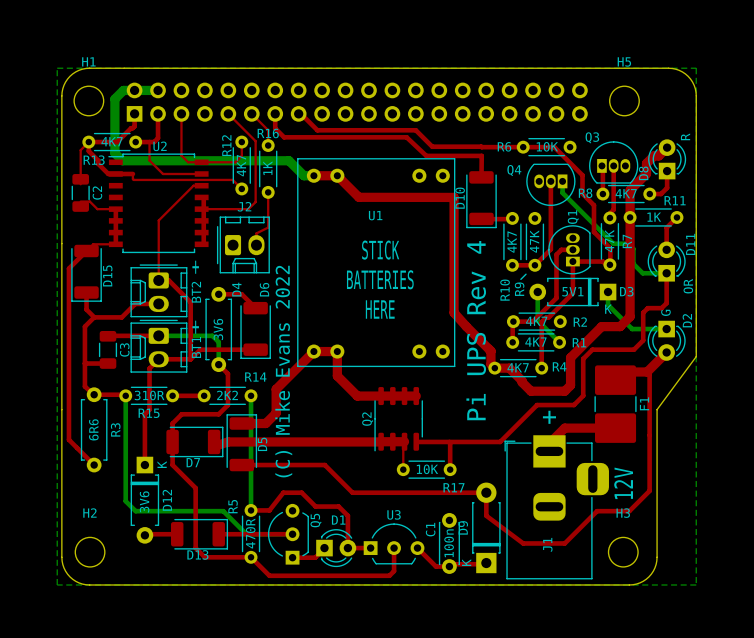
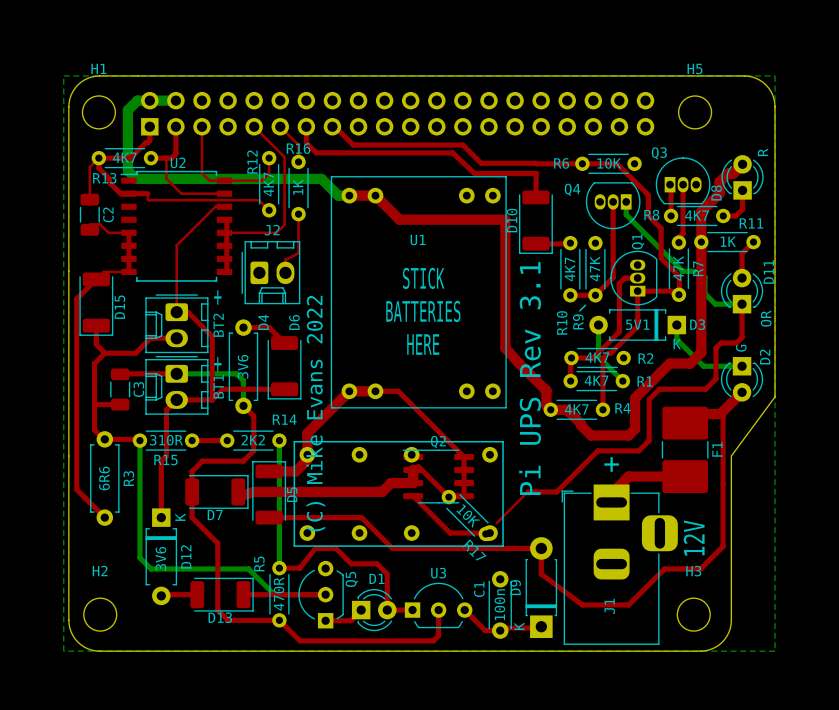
text: Pi UPS Rev 4 (476, 330) -> Pi UPS Rev 3.1 (530, 378)
top track: (337, 351) (337, 376) (357, 396) (416, 396) -> (375, 391) (398, 391) (464, 456) (464, 496)
top track: none -> (418, 466) (448, 497)
Q2 rotation: 0° (398, 419) -> 90° clockwise (438, 476)
top track: (343, 441) (404, 441) (403, 469) -> (382, 491) (391, 483) (413, 483) (413, 469)
top track: (474, 441) (416, 441) (450, 442) -> (527, 491) (496, 523)
top track: (450, 442) (450, 469) -> none
part: none -> (398, 493)
top track: none -> (413, 496) (450, 533) (477, 533)
R17 rotation: 0° (426, 469) -> 45° clockwise (467, 515)

